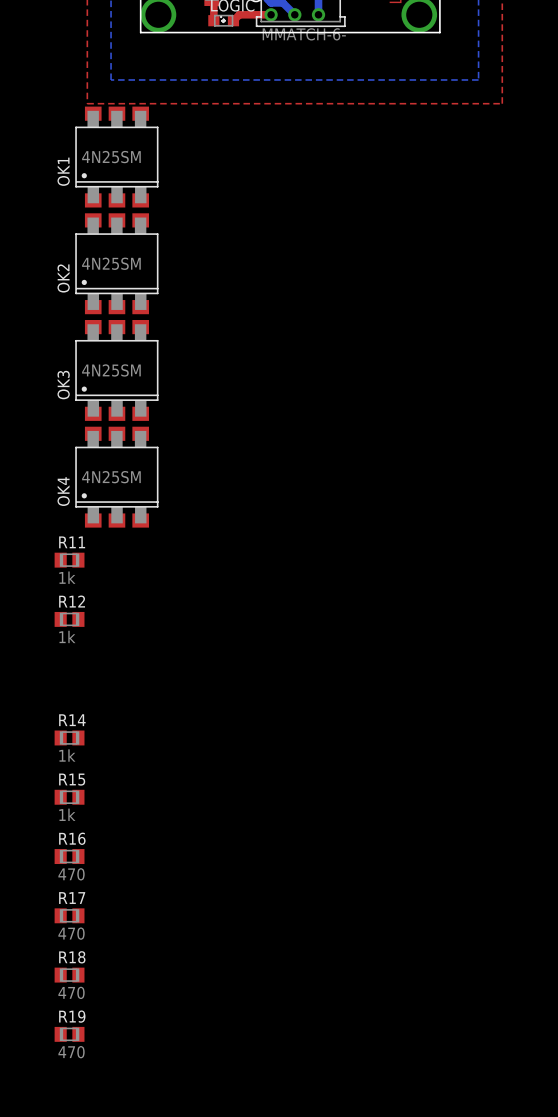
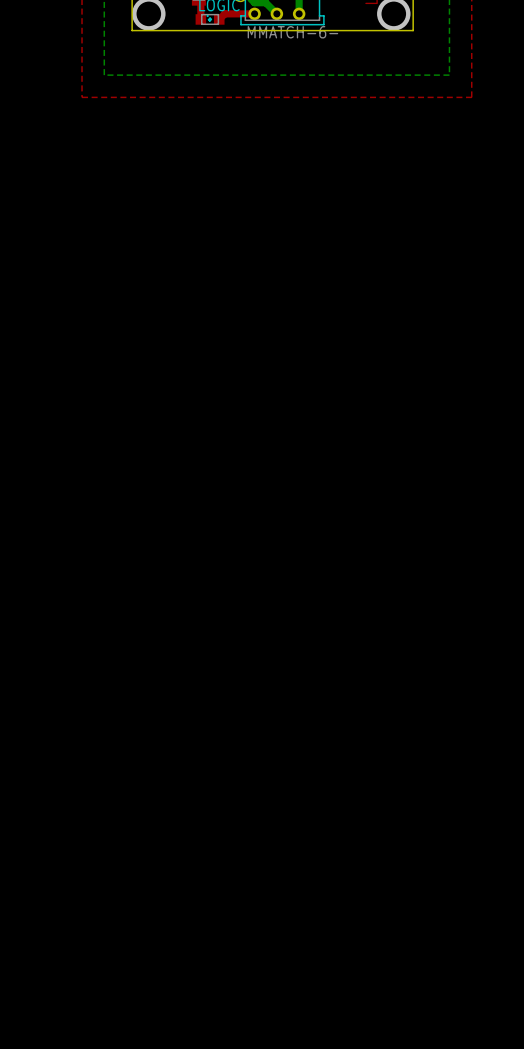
OK1: 4N25SM (116, 157) -> none
OK2: 4N25SM (116, 263) -> none
OK3: 4N25SM (116, 370) -> none
OK4: 4N25SM (116, 477) -> none
R11: 1k (69, 560) -> none
R12: 1k (69, 619) -> none
R14: 1k (69, 737) -> none
R15: 1k (69, 797) -> none
R16: 470 (69, 856) -> none
R17: 470 (69, 915) -> none
R18: 470 (69, 975) -> none
R19: 470 (69, 1034) -> none

